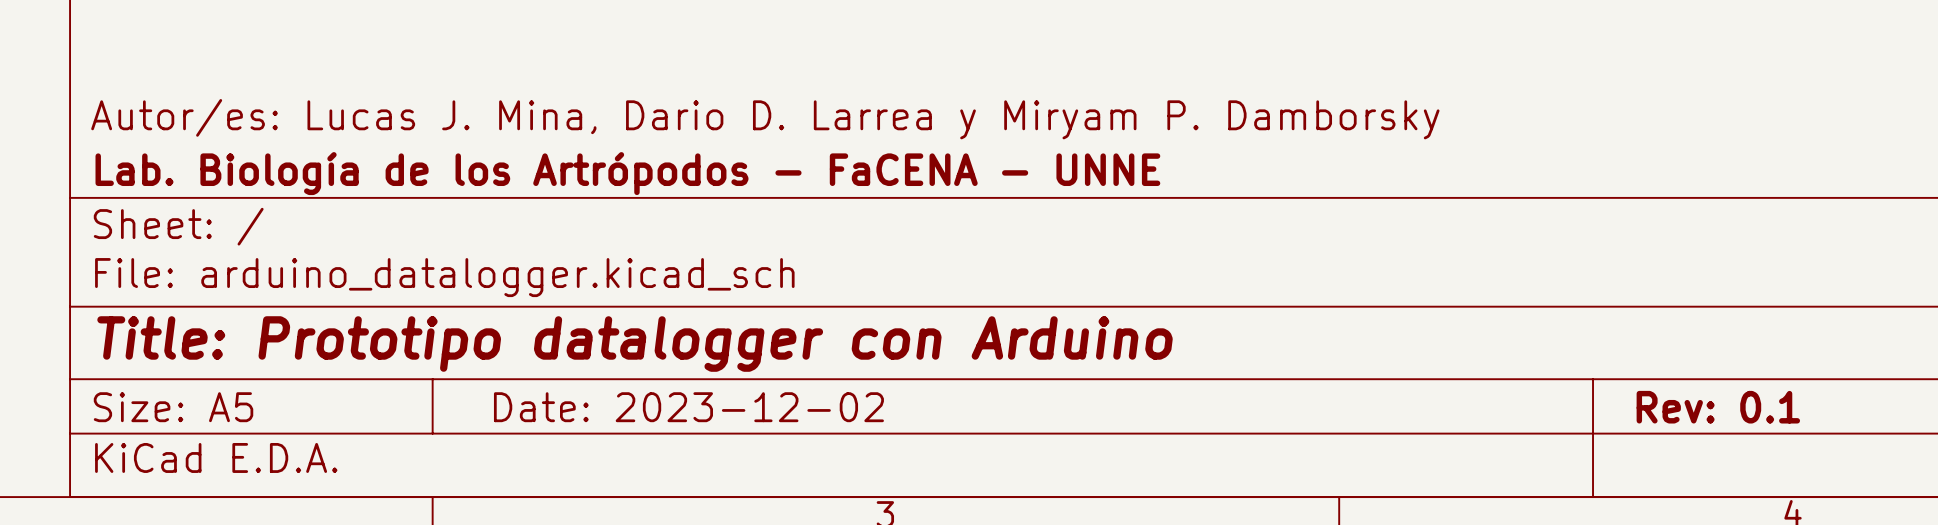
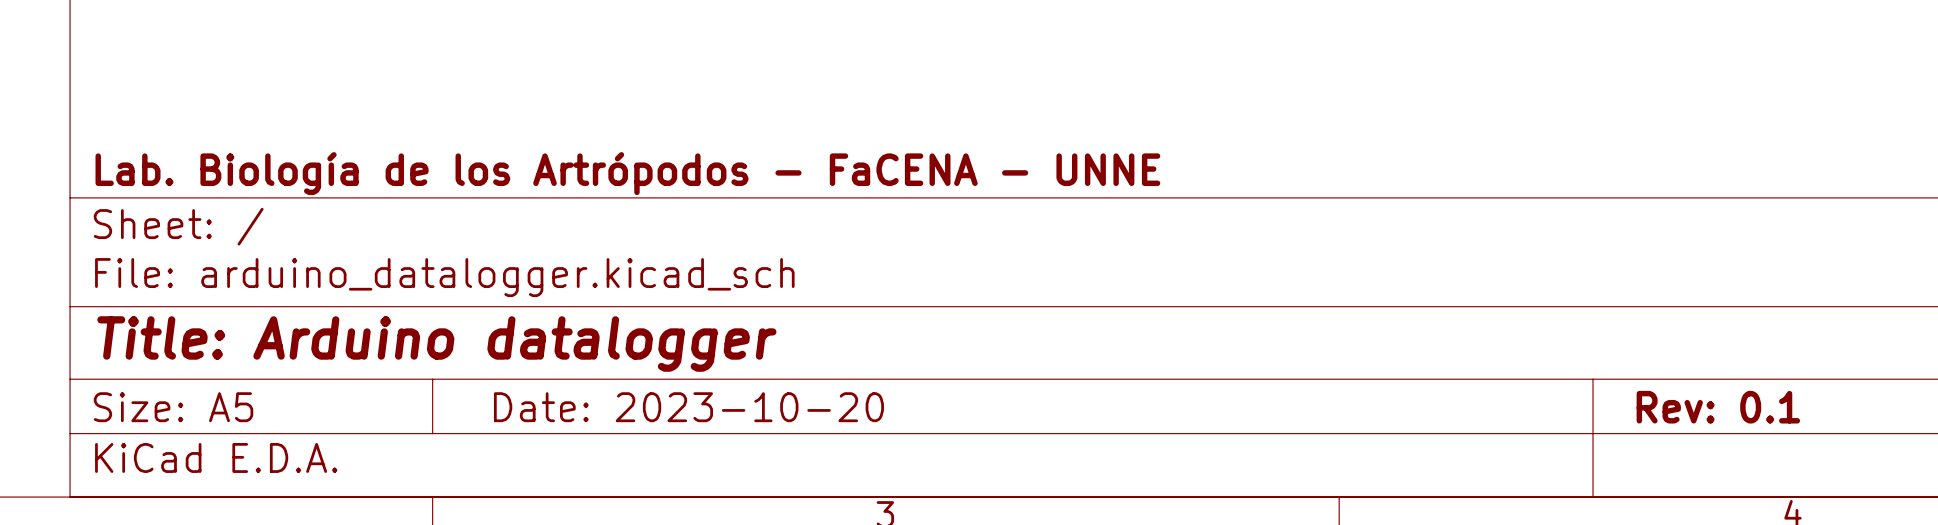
title block: Autor/es: Lucas J. Mina, Dario D. Larrea y Miryam P. Damborsky (765, 119) -> none
title block: Title: Prototipo datalogger con Arduino (635, 344) -> Title: Arduino datalogger (436, 344)
title block: Date: 2023-12-02 (688, 407) -> Date: 2023-10-20 (688, 407)

